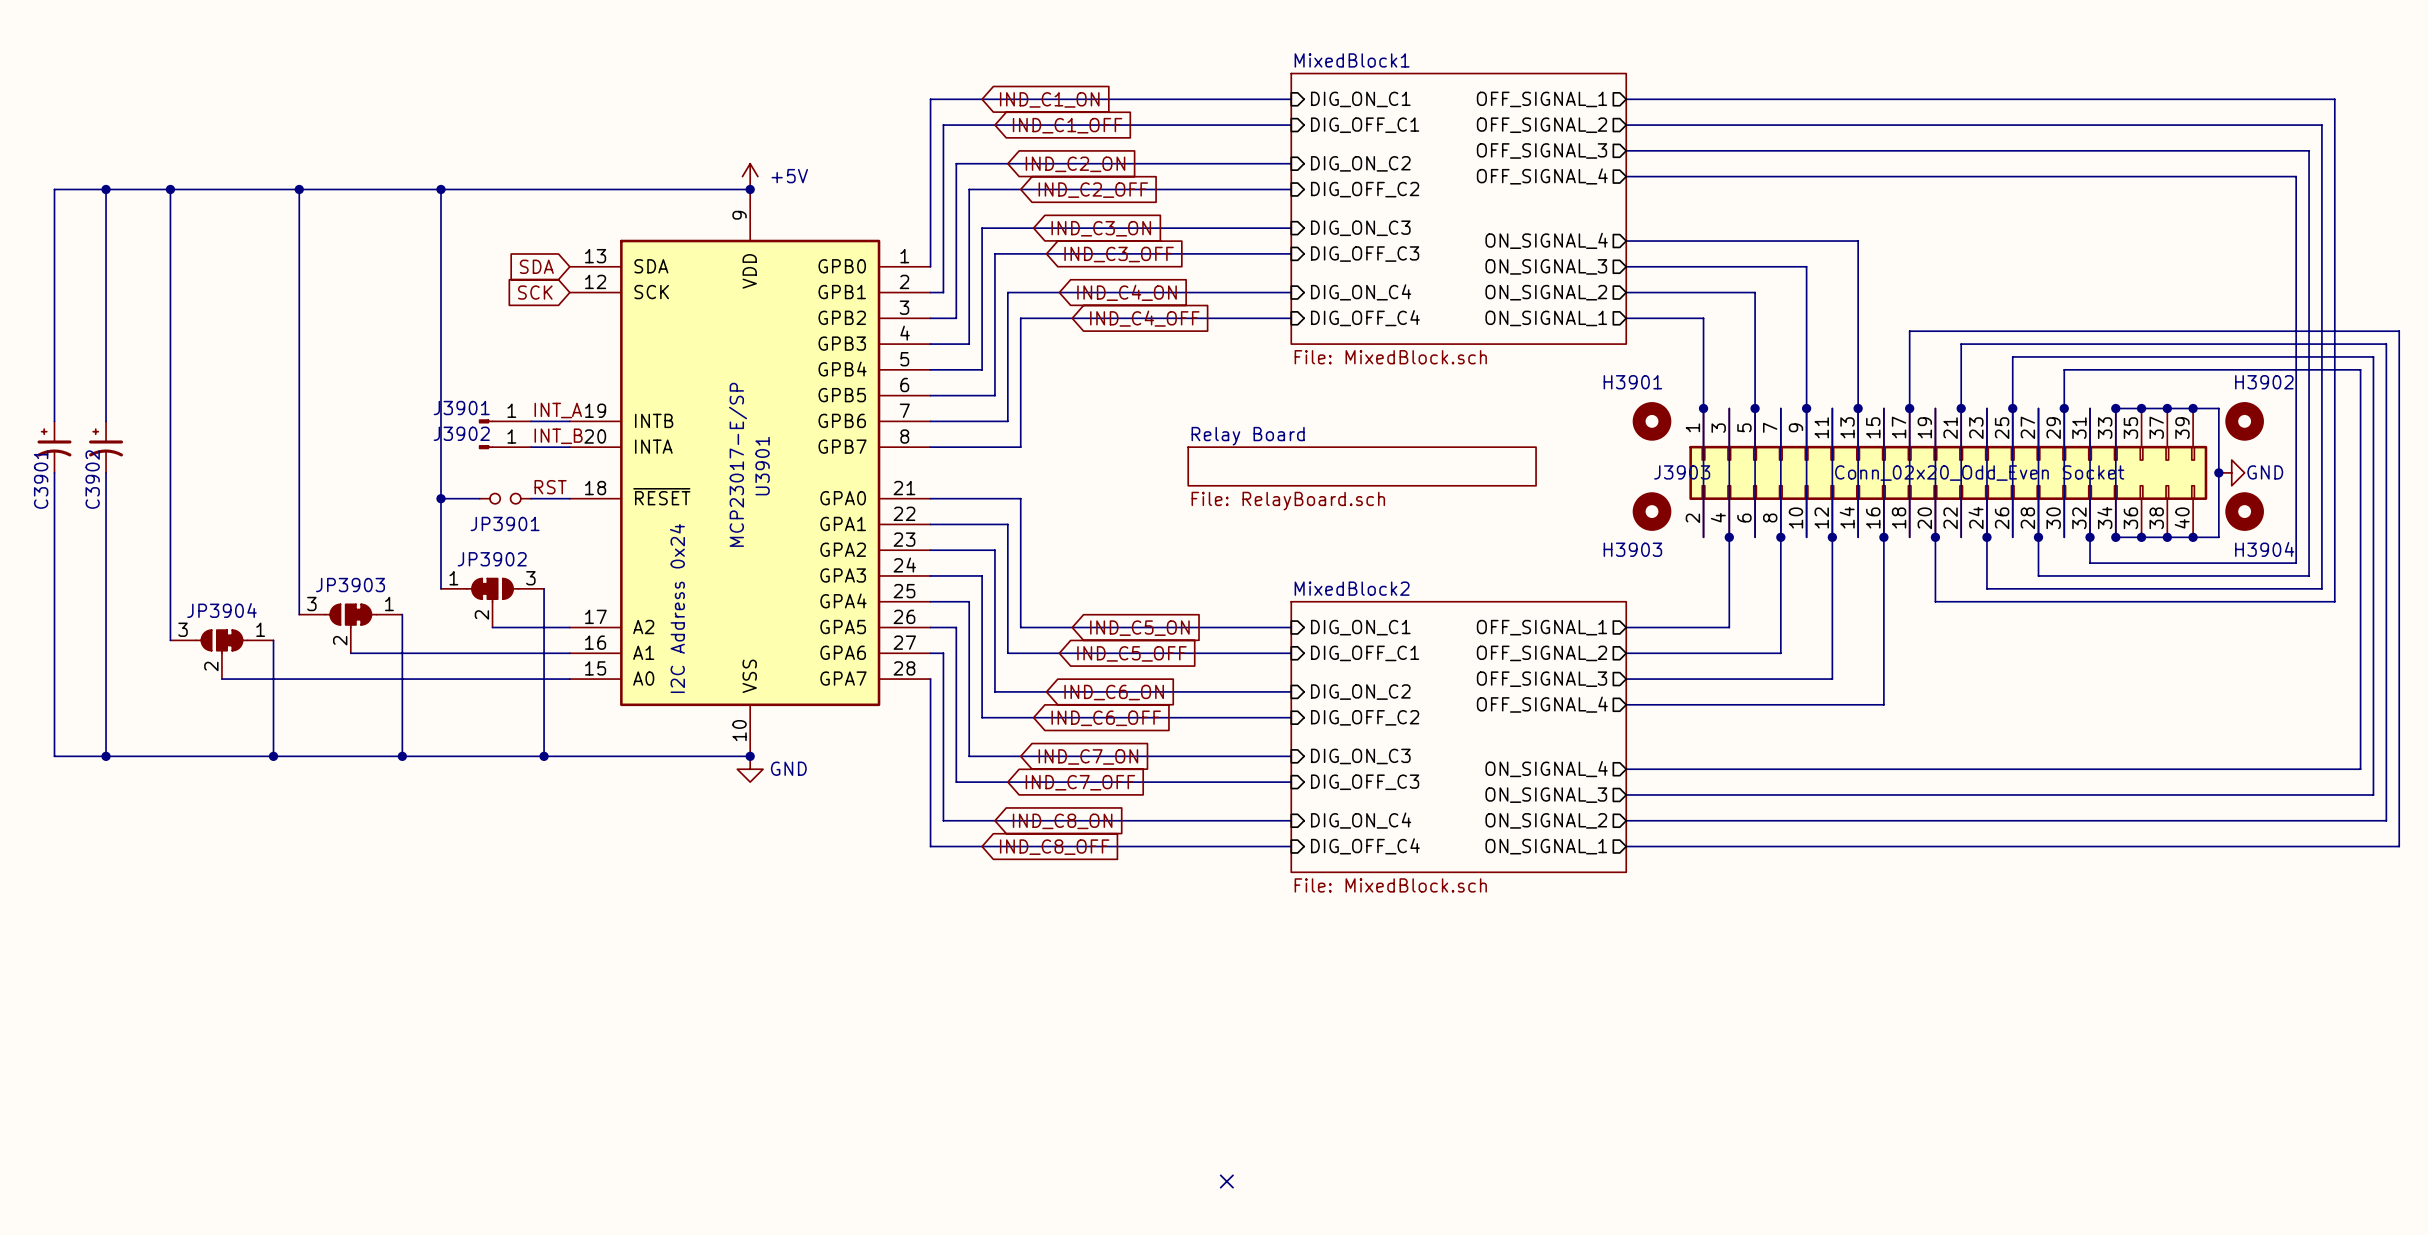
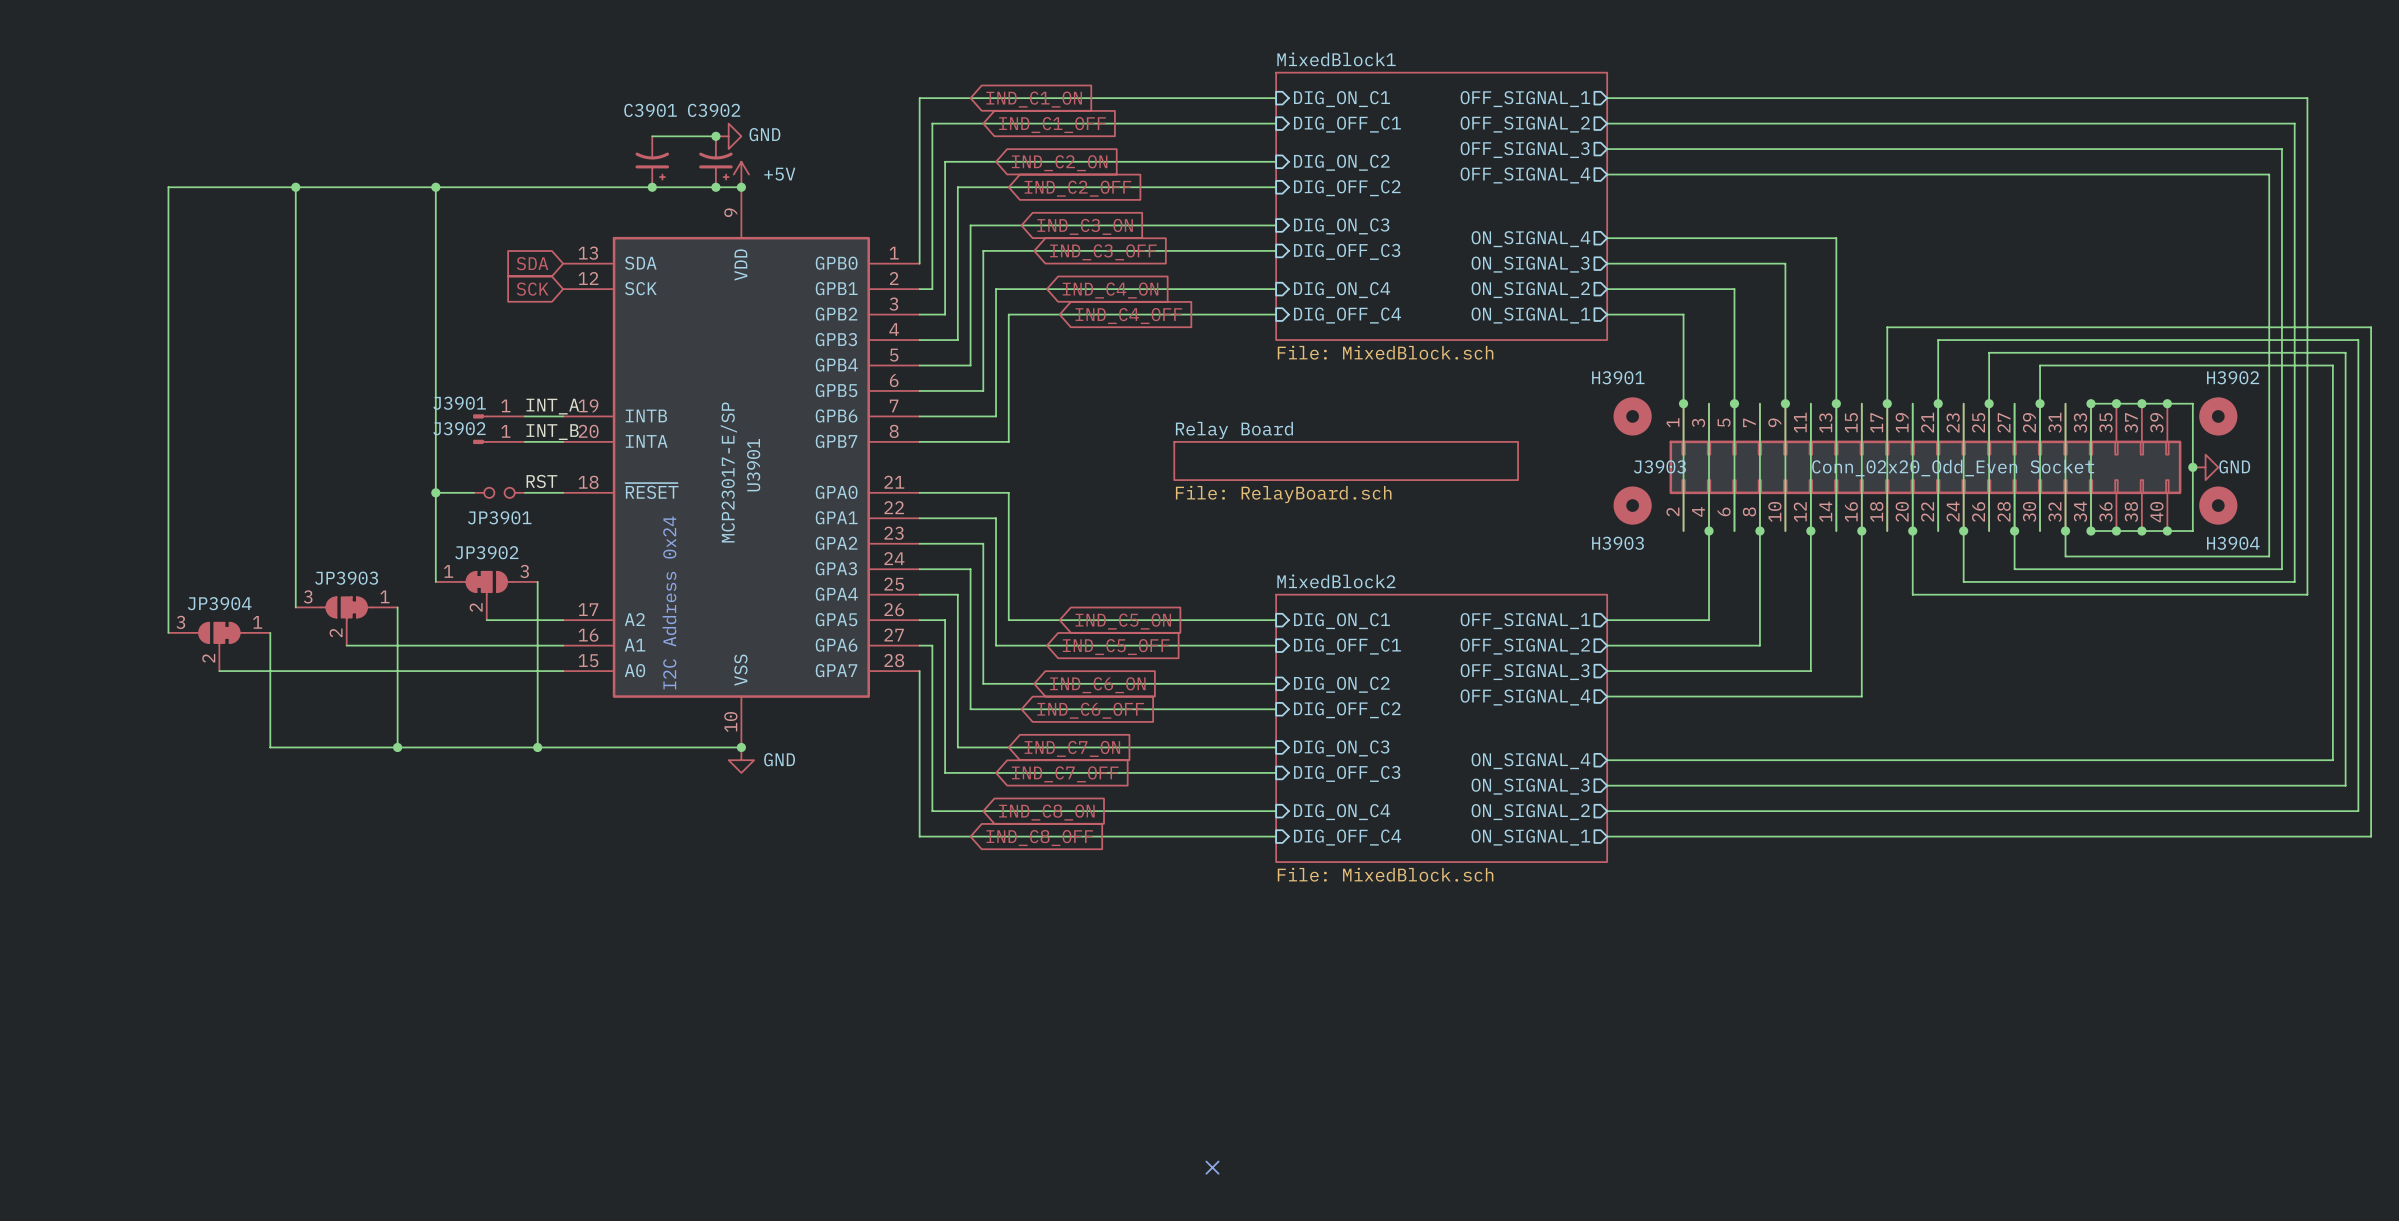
wire: none -> (652, 136) (715, 136)
junction: none -> (715, 136)
power symbol: none -> GND (728, 136)
wire: (106, 189) (106, 421) -> none
junction: (106, 189) -> none
wire: (170, 189) (54, 189) (54, 421) -> none
junction: (170, 189) -> none
junction: none -> (652, 187)
junction: none -> (715, 187)
C3901 rotation: 0° (54, 442) -> 180° (652, 166)
C3902 rotation: 0° (106, 442) -> 180° (715, 166)
C3901 position: (54, 447) -> (652, 161)
C3902 position: (106, 447) -> (715, 161)
wire: (54, 472) (54, 756) (273, 756) -> none
wire: (106, 472) (106, 756) -> none
C3901 name position: C3901 (41, 479) -> C3901 (650, 110)
C3902 name position: C3902 (92, 479) -> C3902 (714, 110)
junction: (106, 756) -> none
junction: (273, 756) -> none

